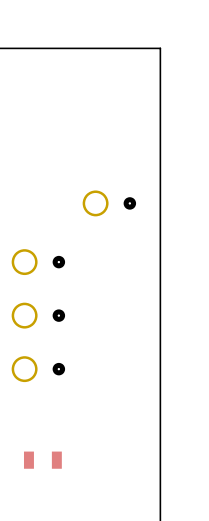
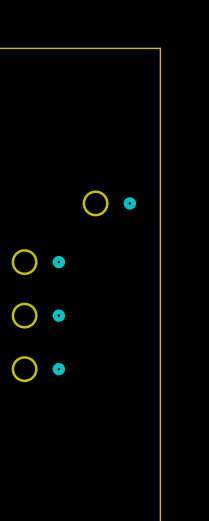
part: (42, 460) -> none

